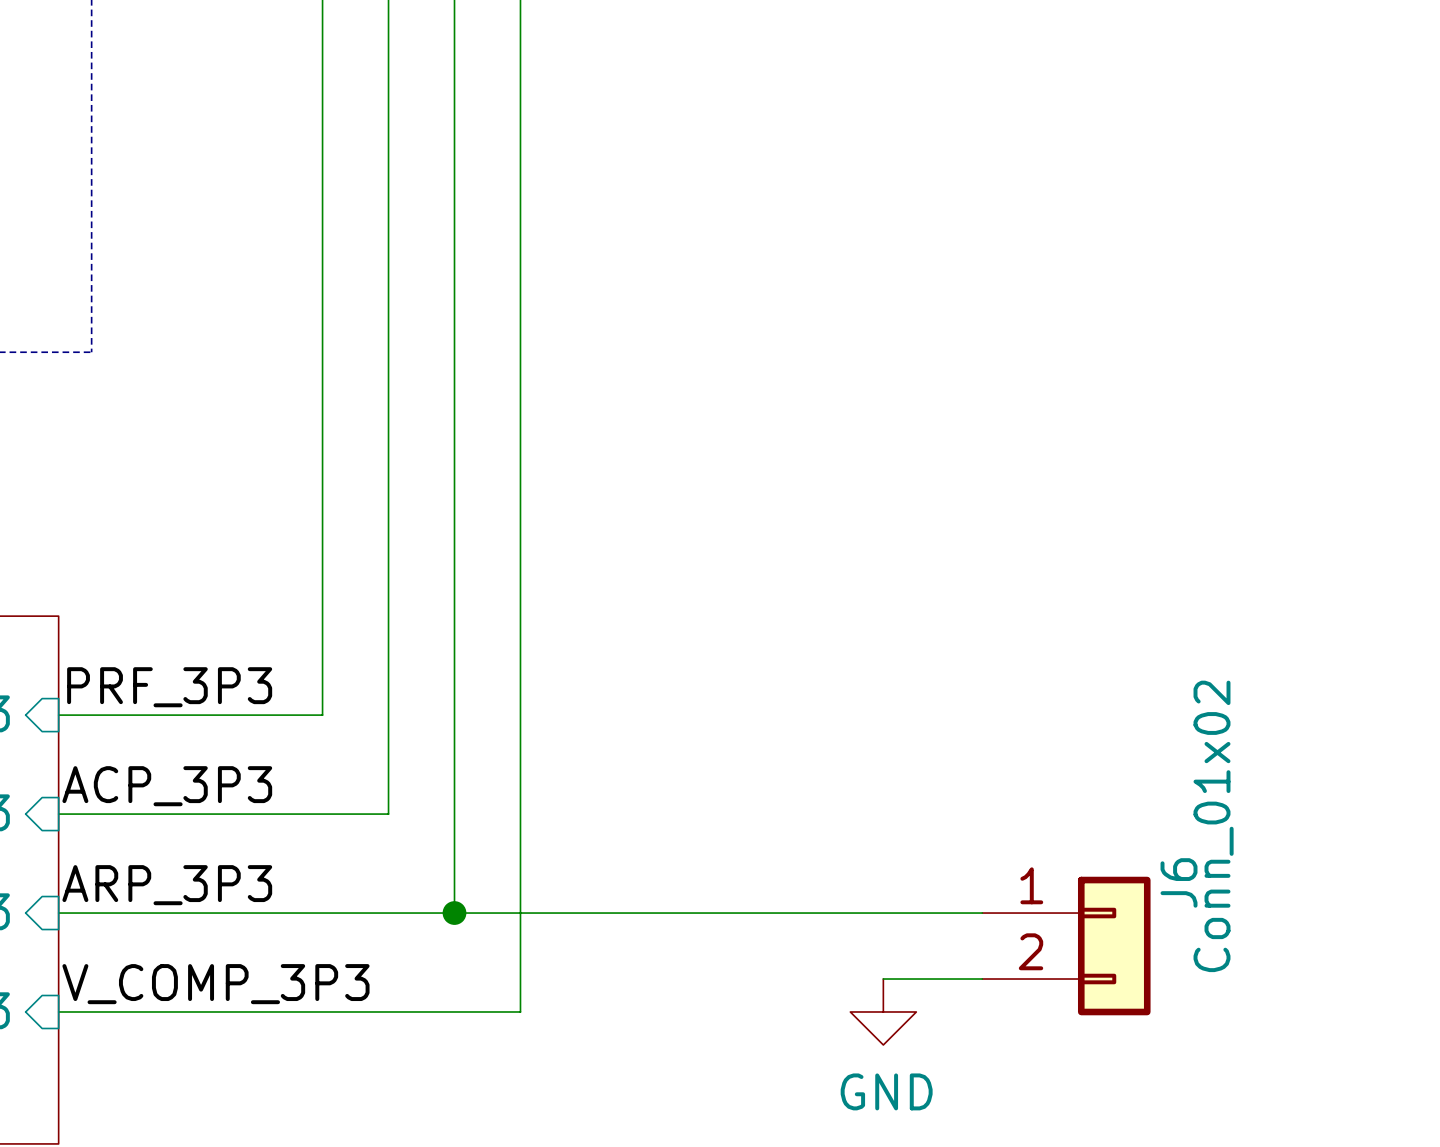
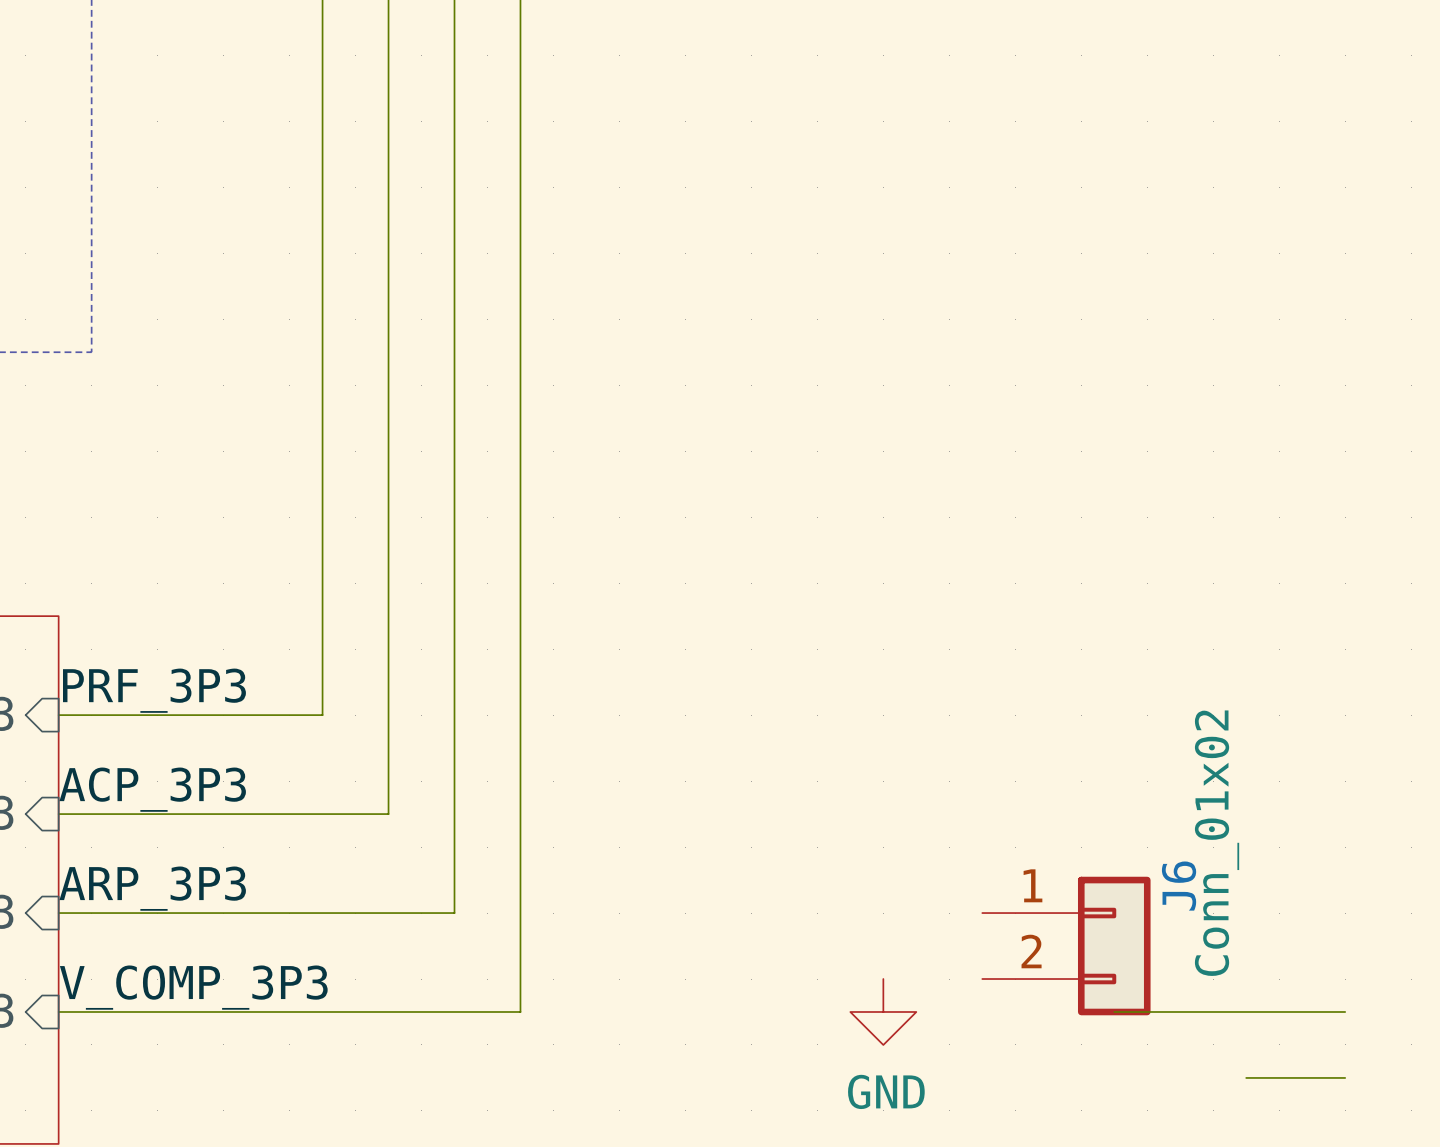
wire: (454, 913) (982, 913) -> none
junction: (454, 913) -> none
wire: (883, 979) (982, 979) -> (1246, 1077) (1345, 1077)
wire: none -> (1114, 1011) (1345, 1011)

